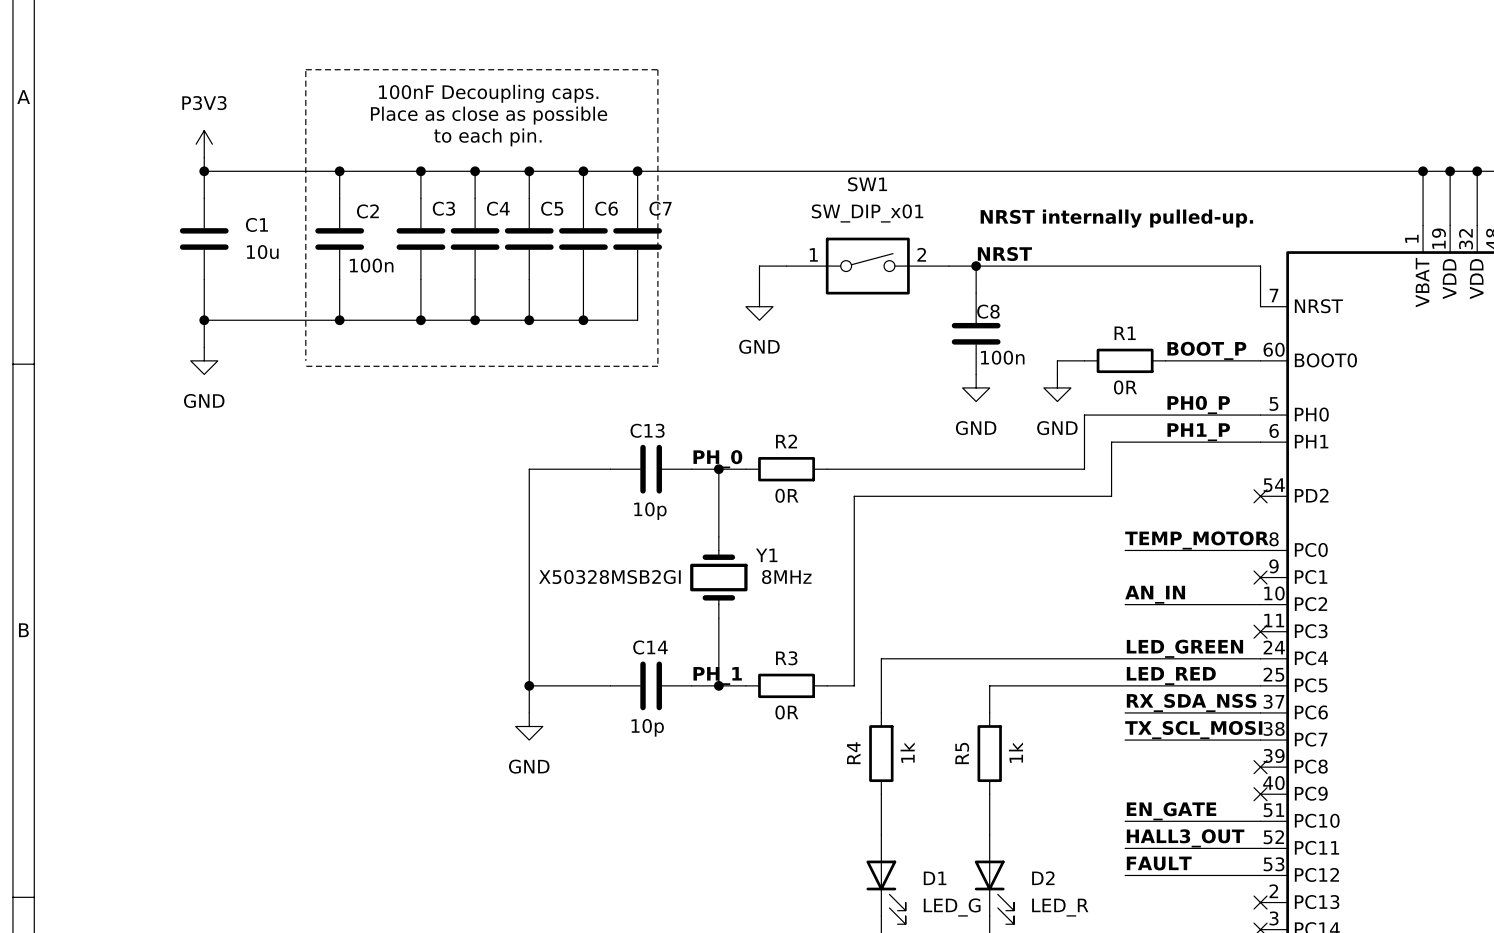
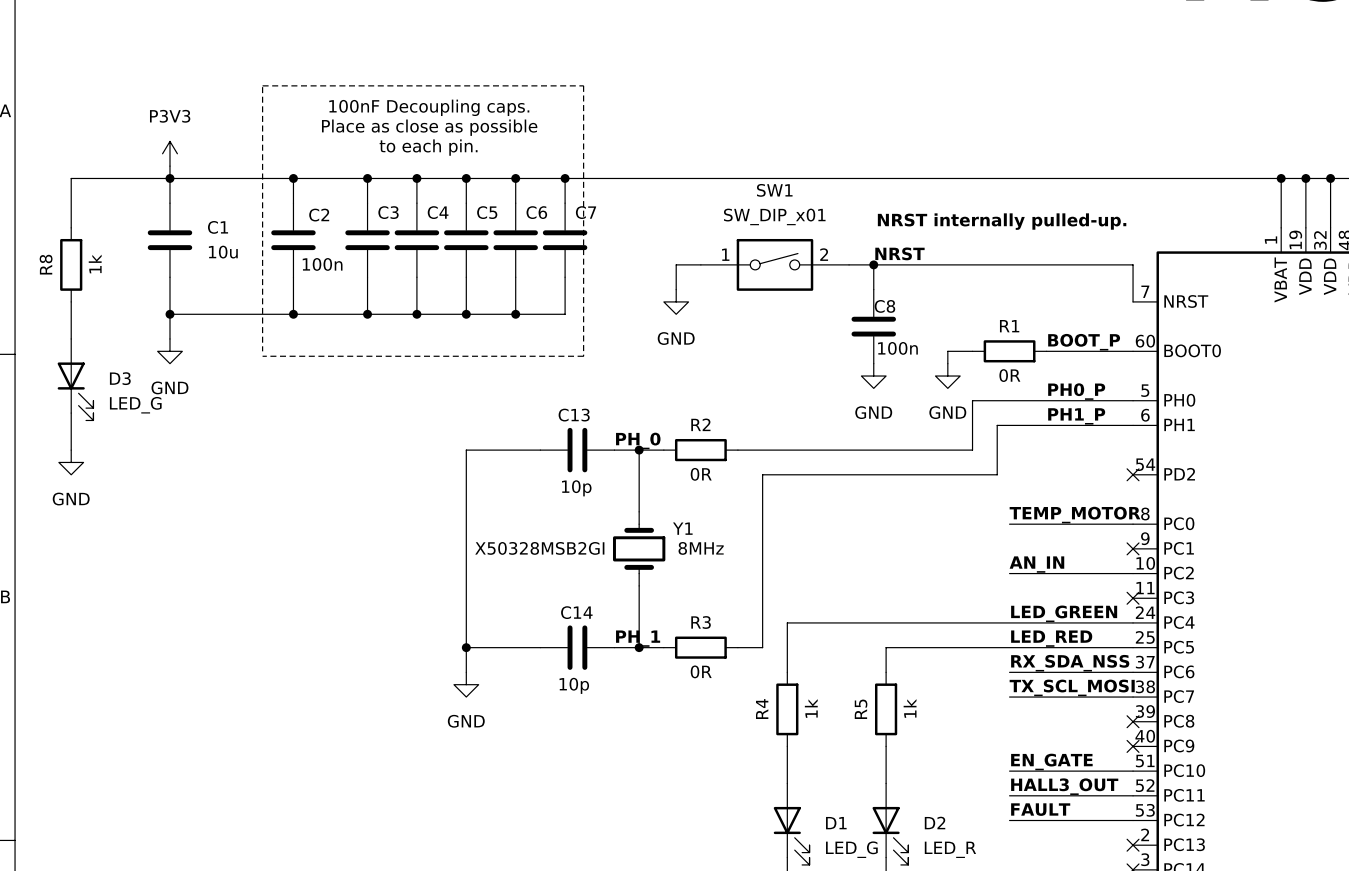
wire: none -> (169, 178) (71, 178) (71, 227)
R8: none -> 1k (71, 264)
wire: none -> (71, 301) (71, 338)
D3: none -> LED_G (75, 379)
wire: none -> (71, 413) (71, 450)
power symbol: none -> GND (71, 462)

